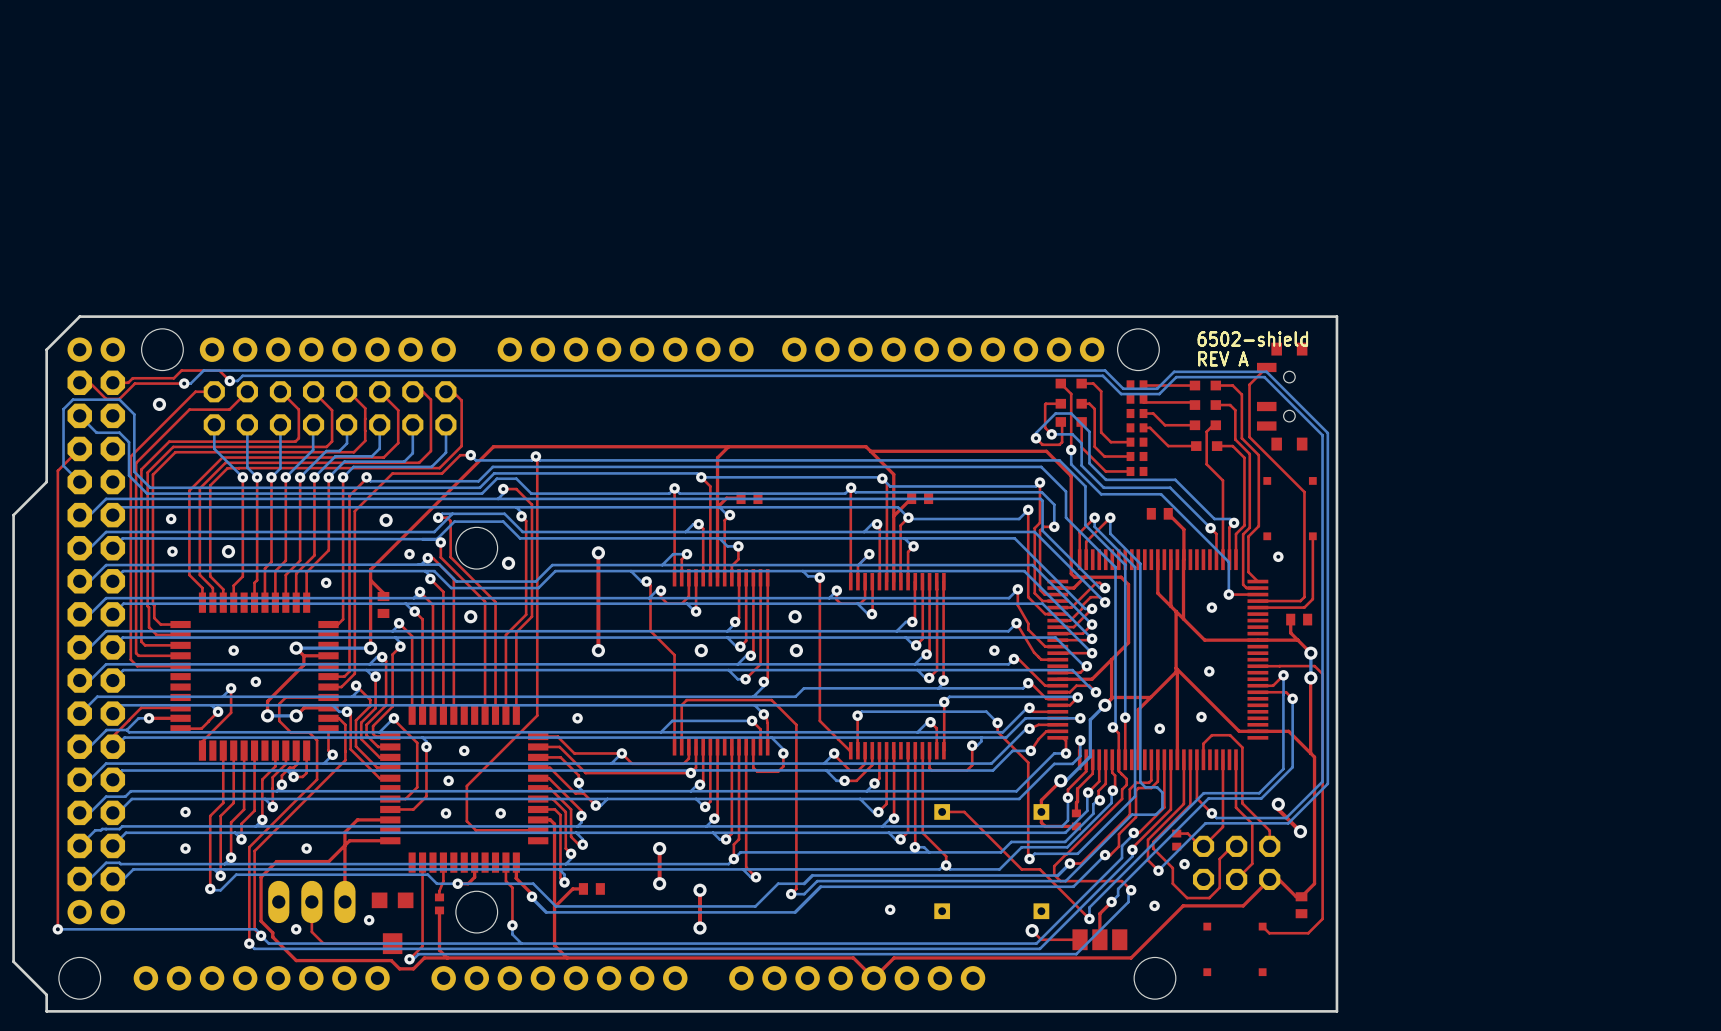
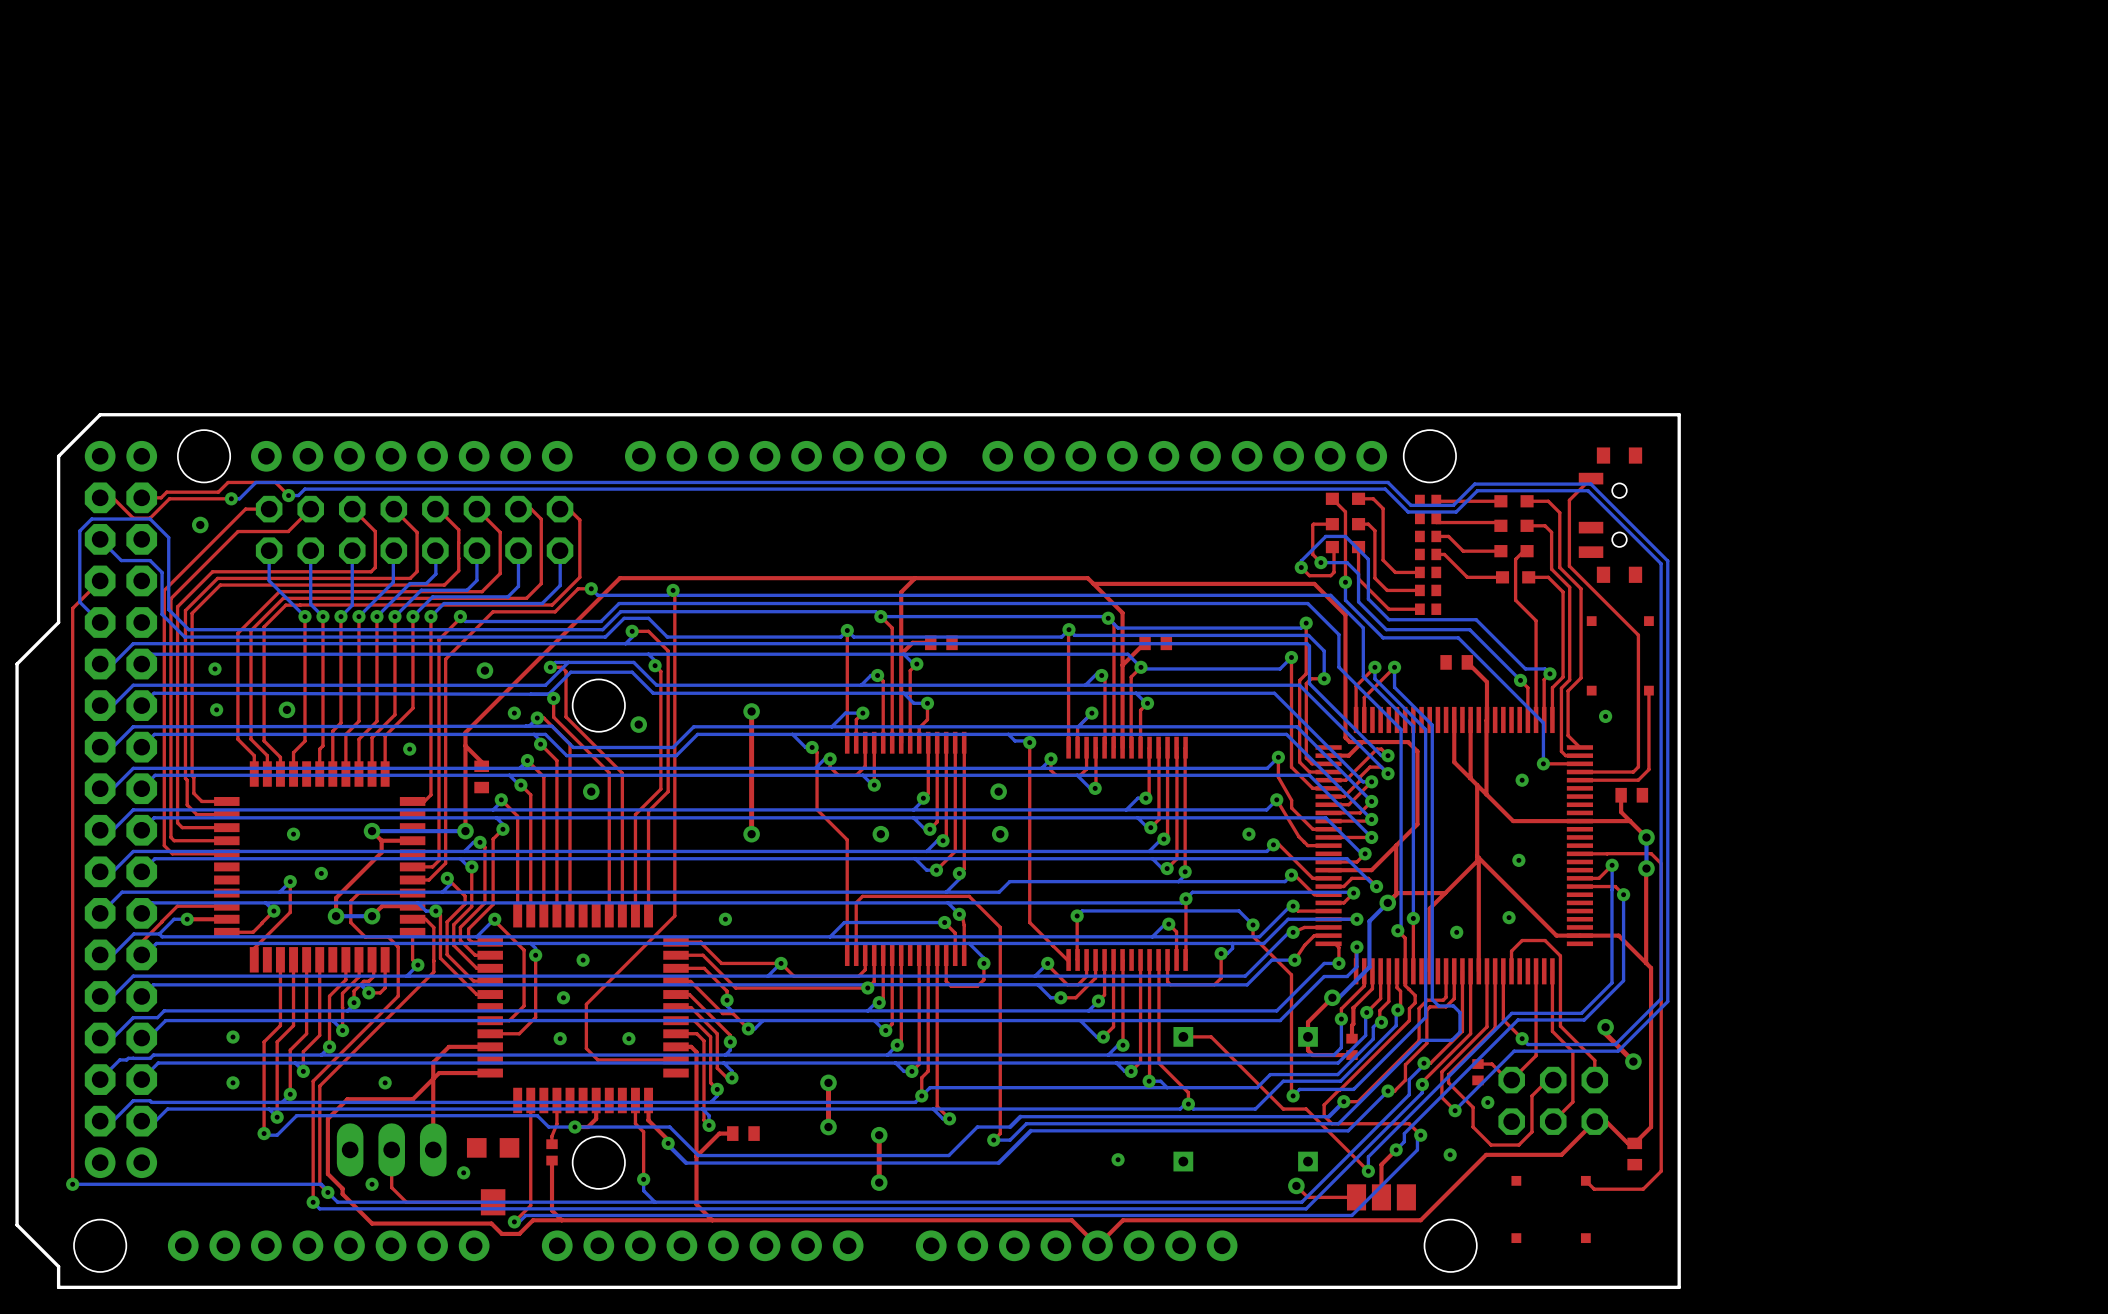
text: 6502-shield (1252, 338) -> none
text: REV A (1223, 358) -> none

